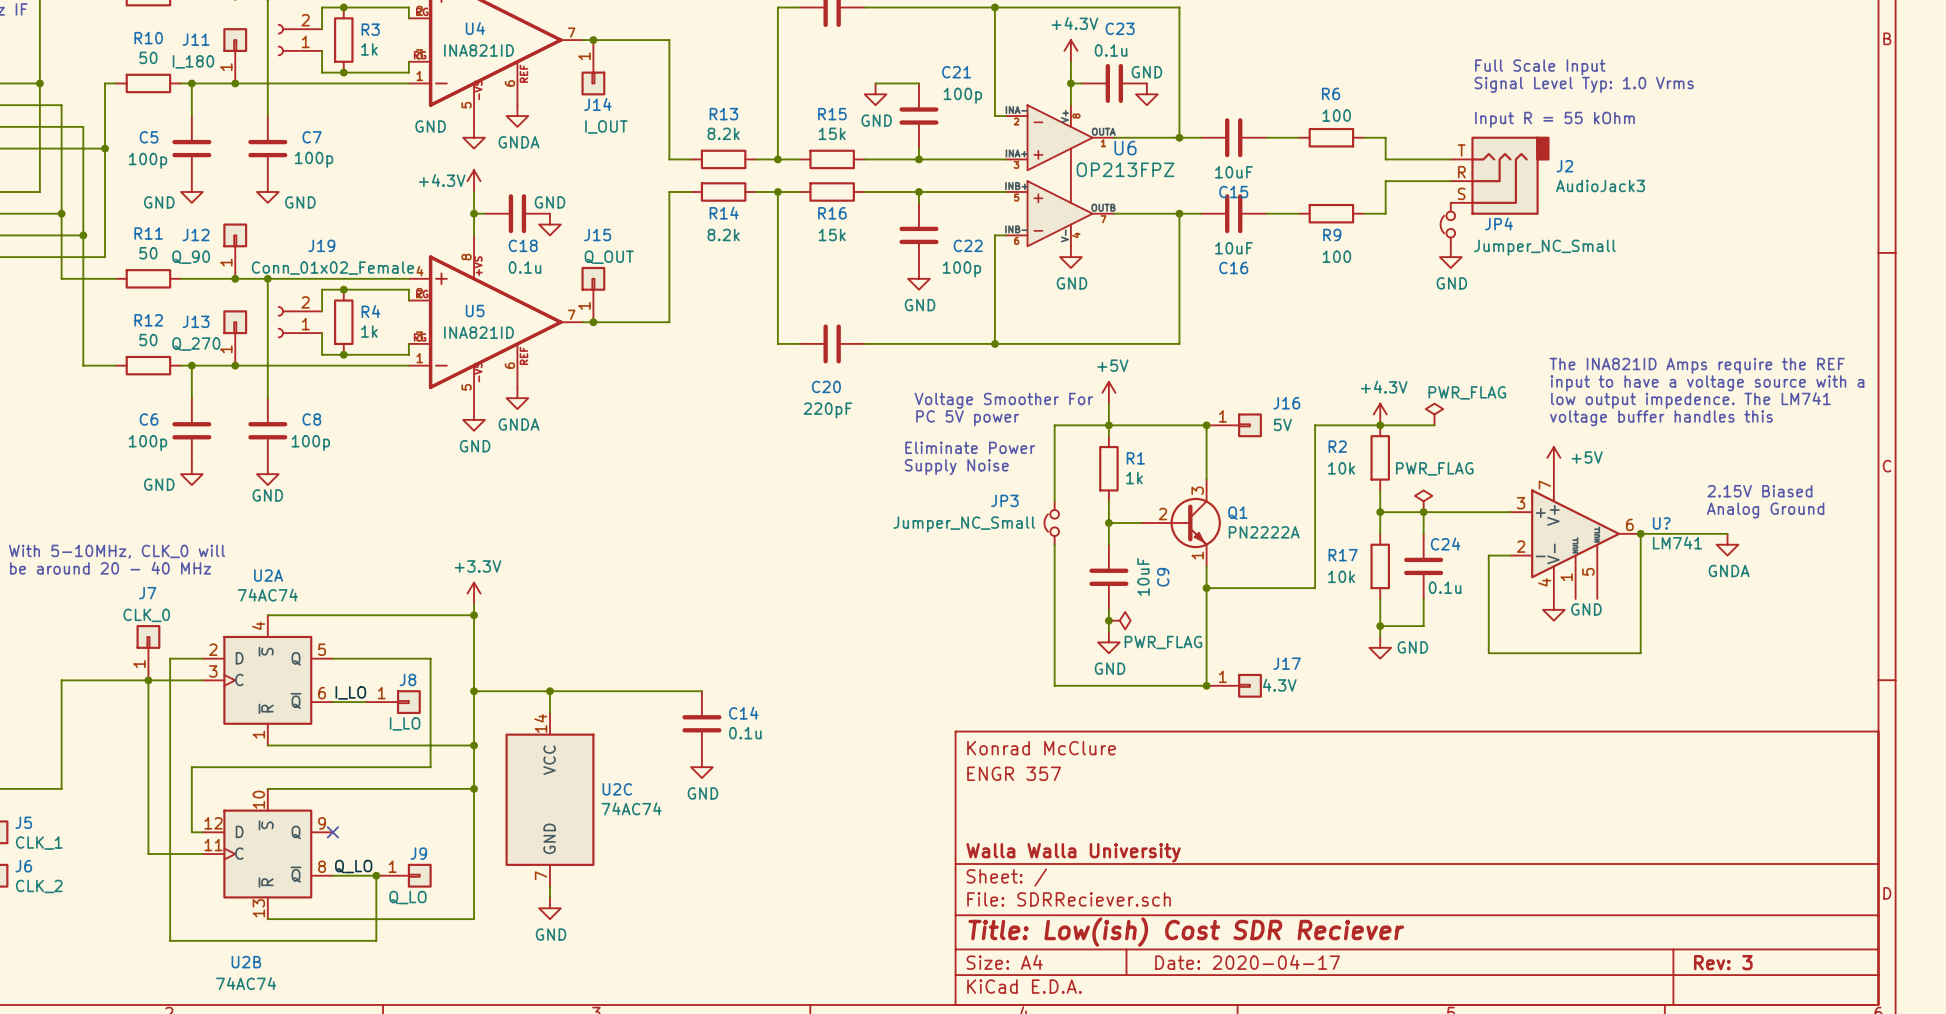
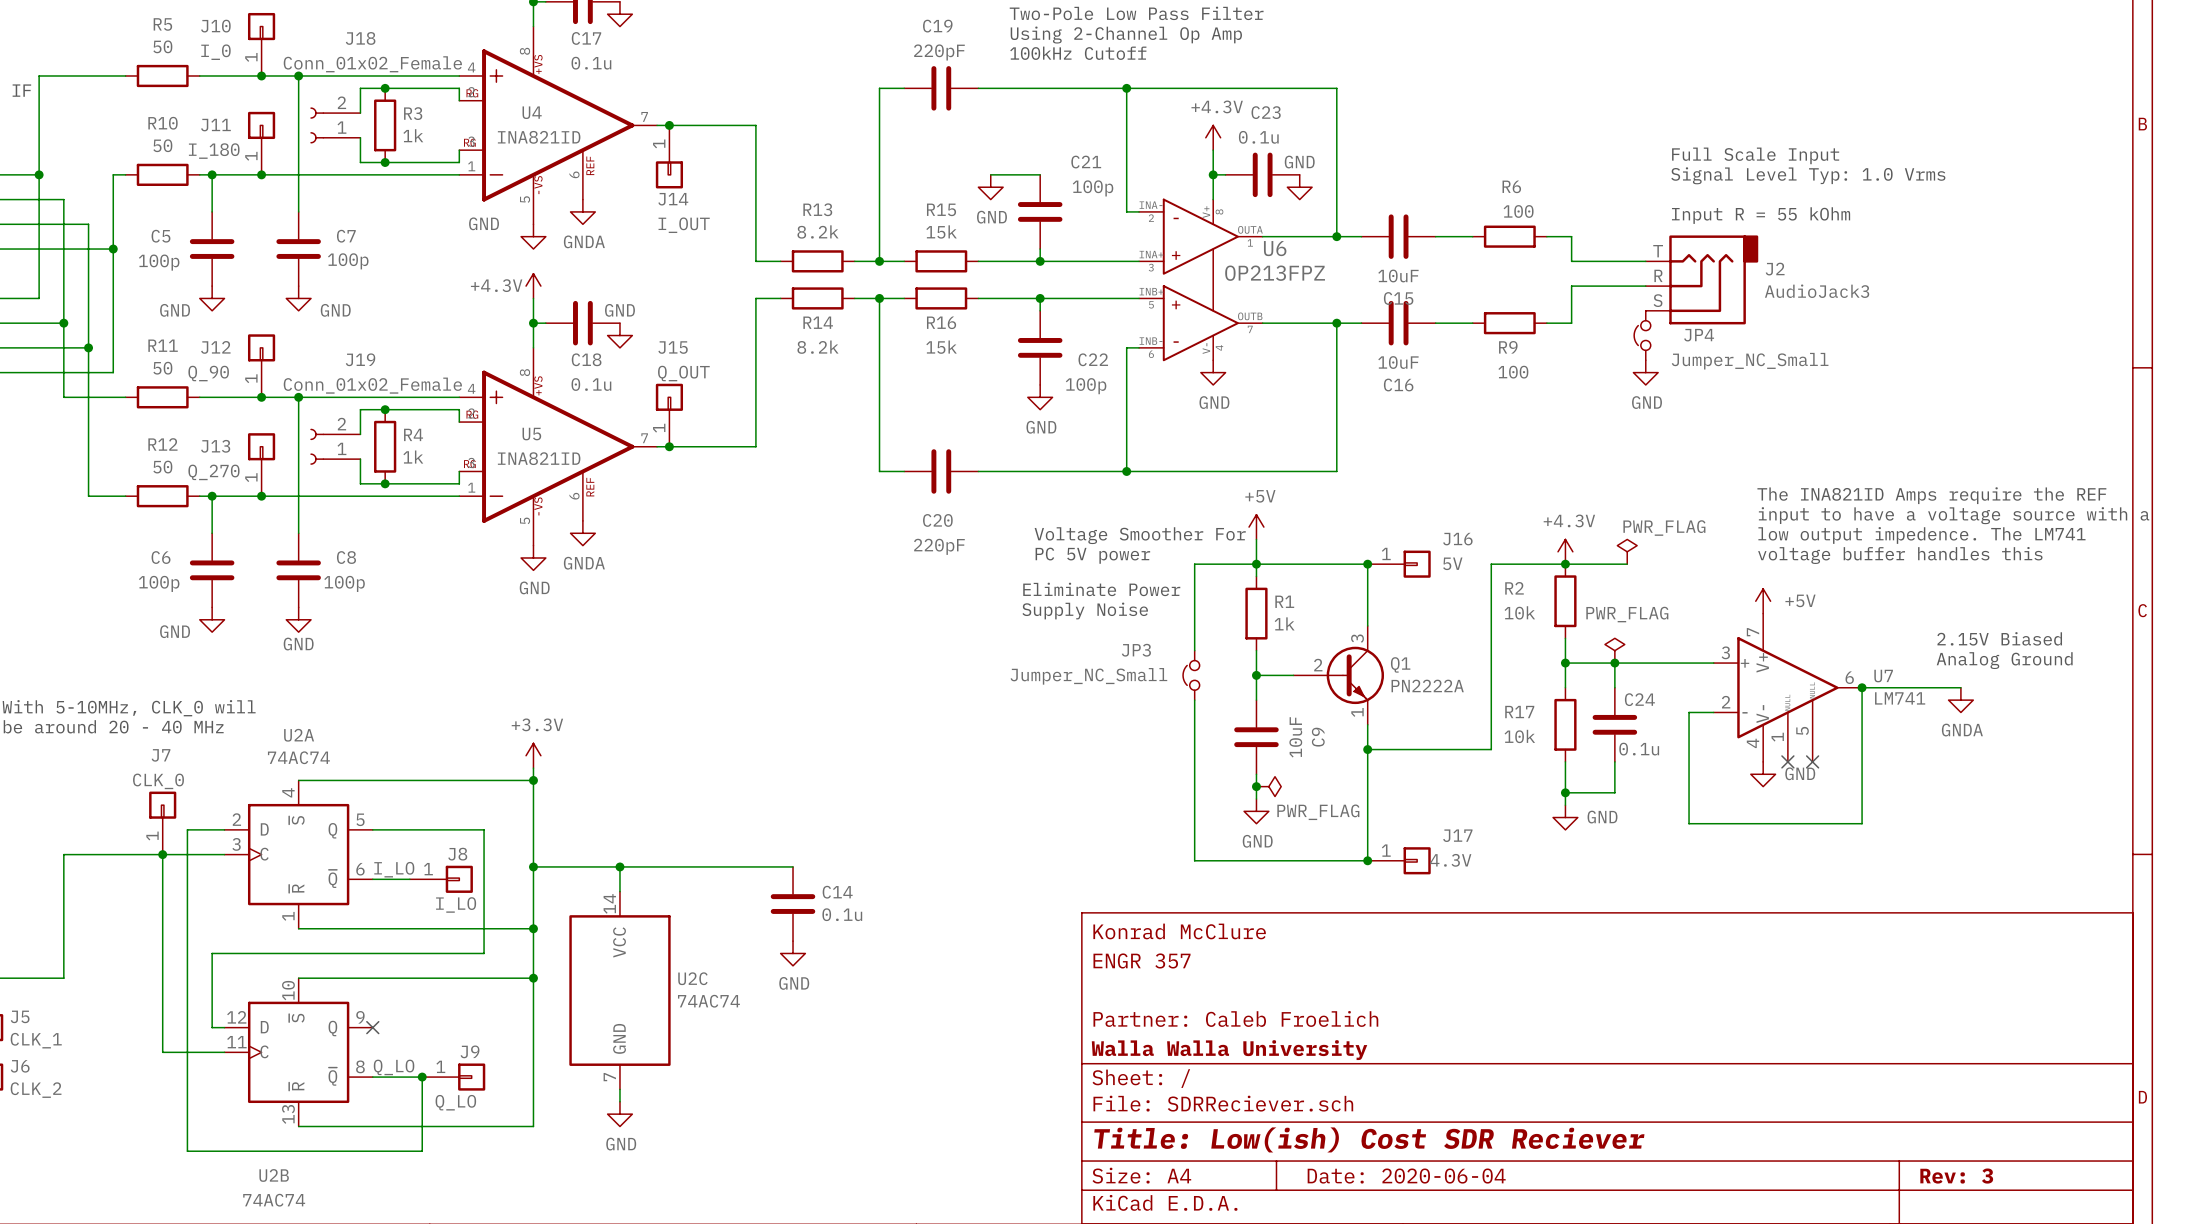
U? name: U? (1661, 523) -> U7 (1883, 676)
no-connect mark: none -> (1787, 761)
no-connect mark: none -> (1812, 761)
title block: none -> Partner: Caleb Froelich (1235, 1018)
title block: Date: 2020-04-17 (1247, 962) -> Date: 2020-06-04 (1406, 1176)

